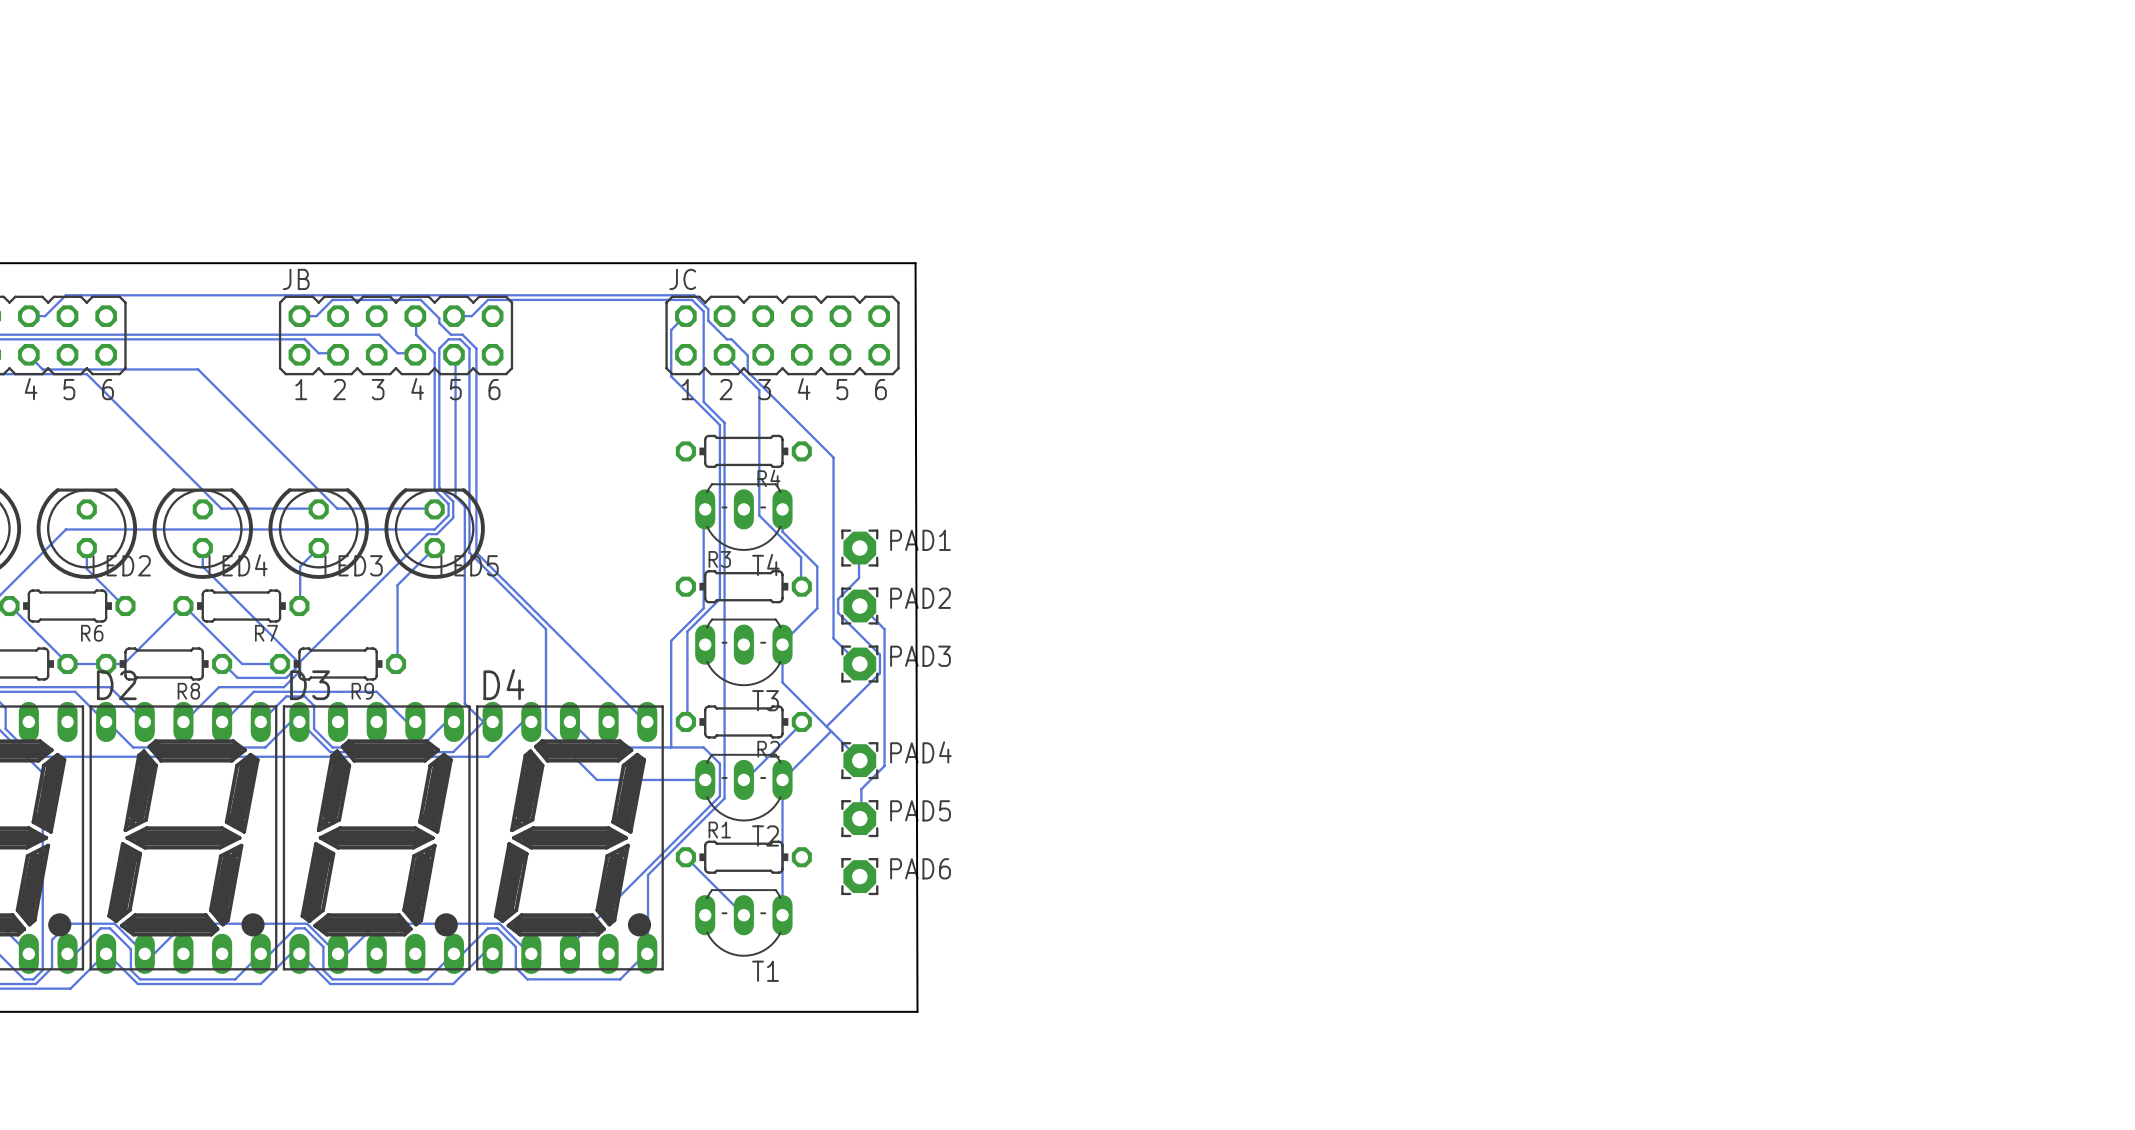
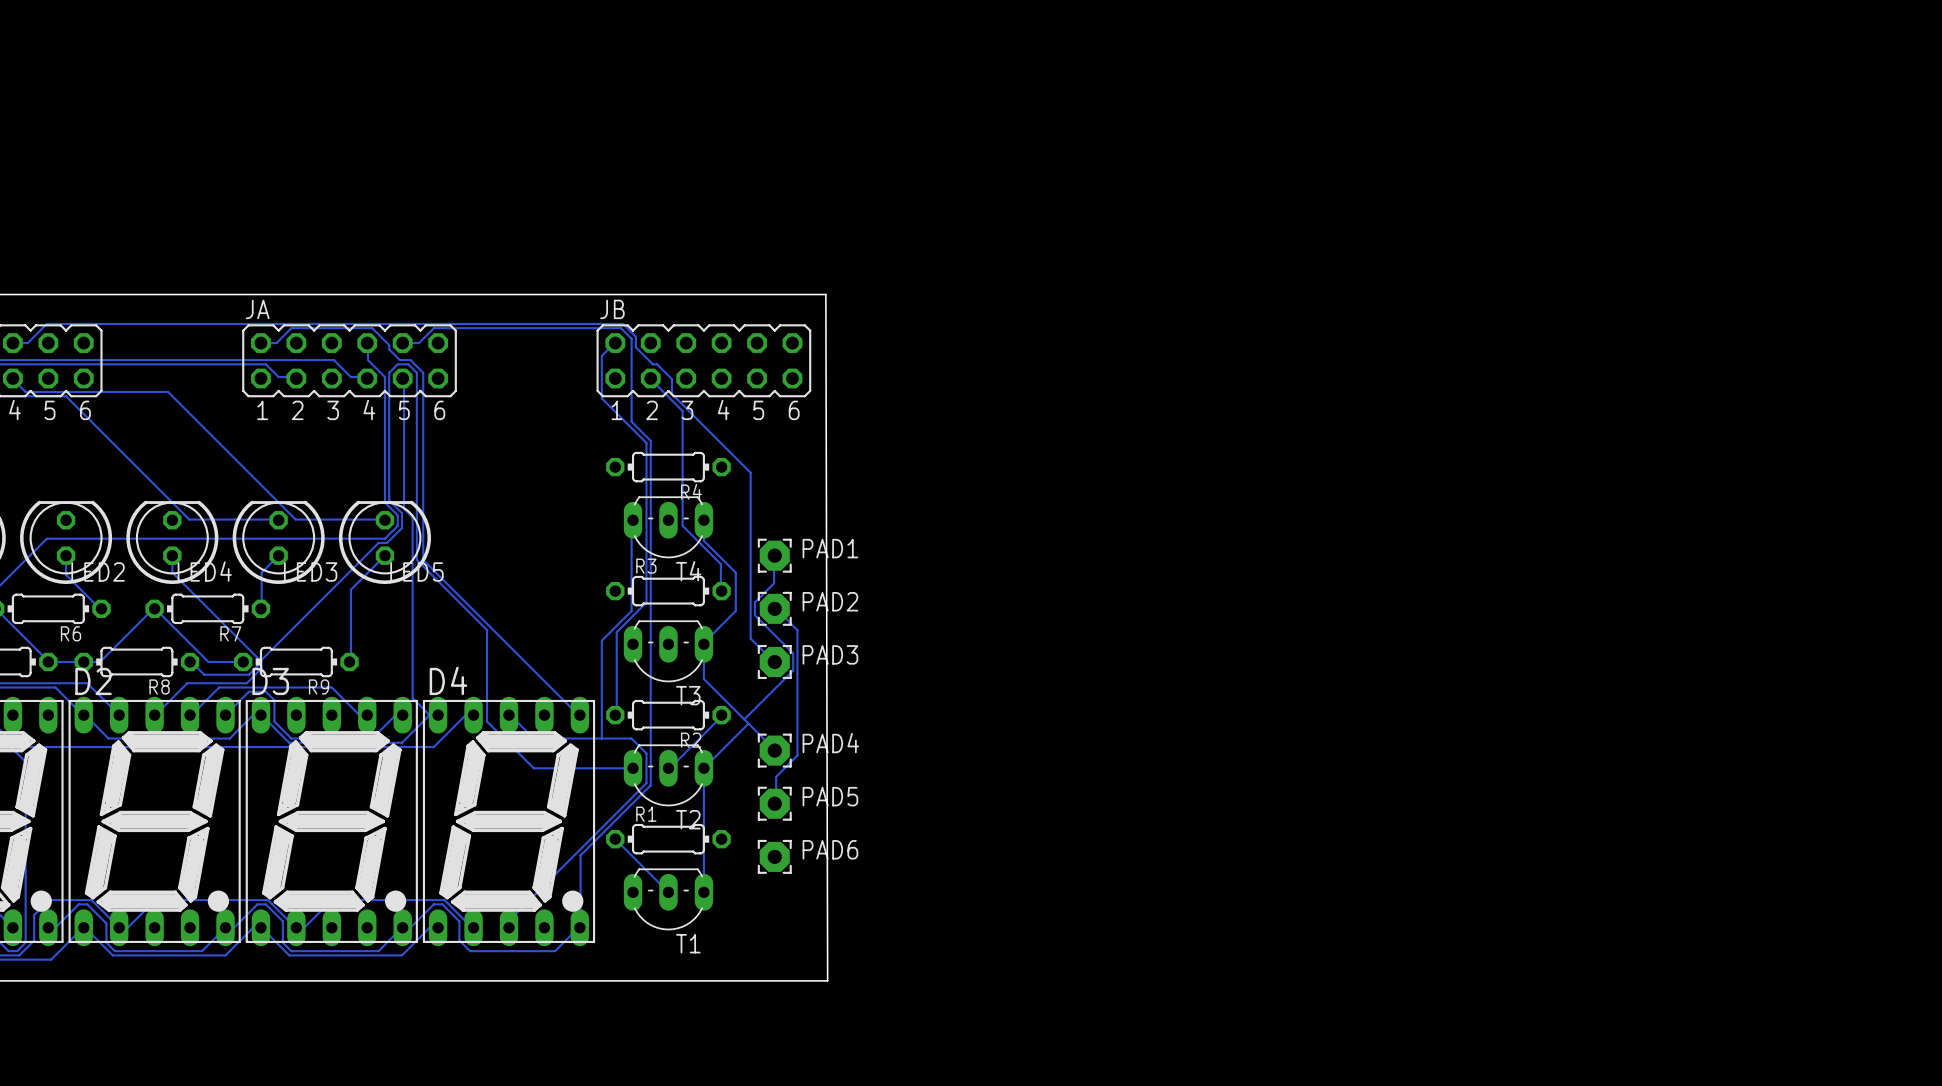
JB name: JB (296, 279) -> JA (257, 309)
JC name: JC (682, 279) -> JB (612, 309)

